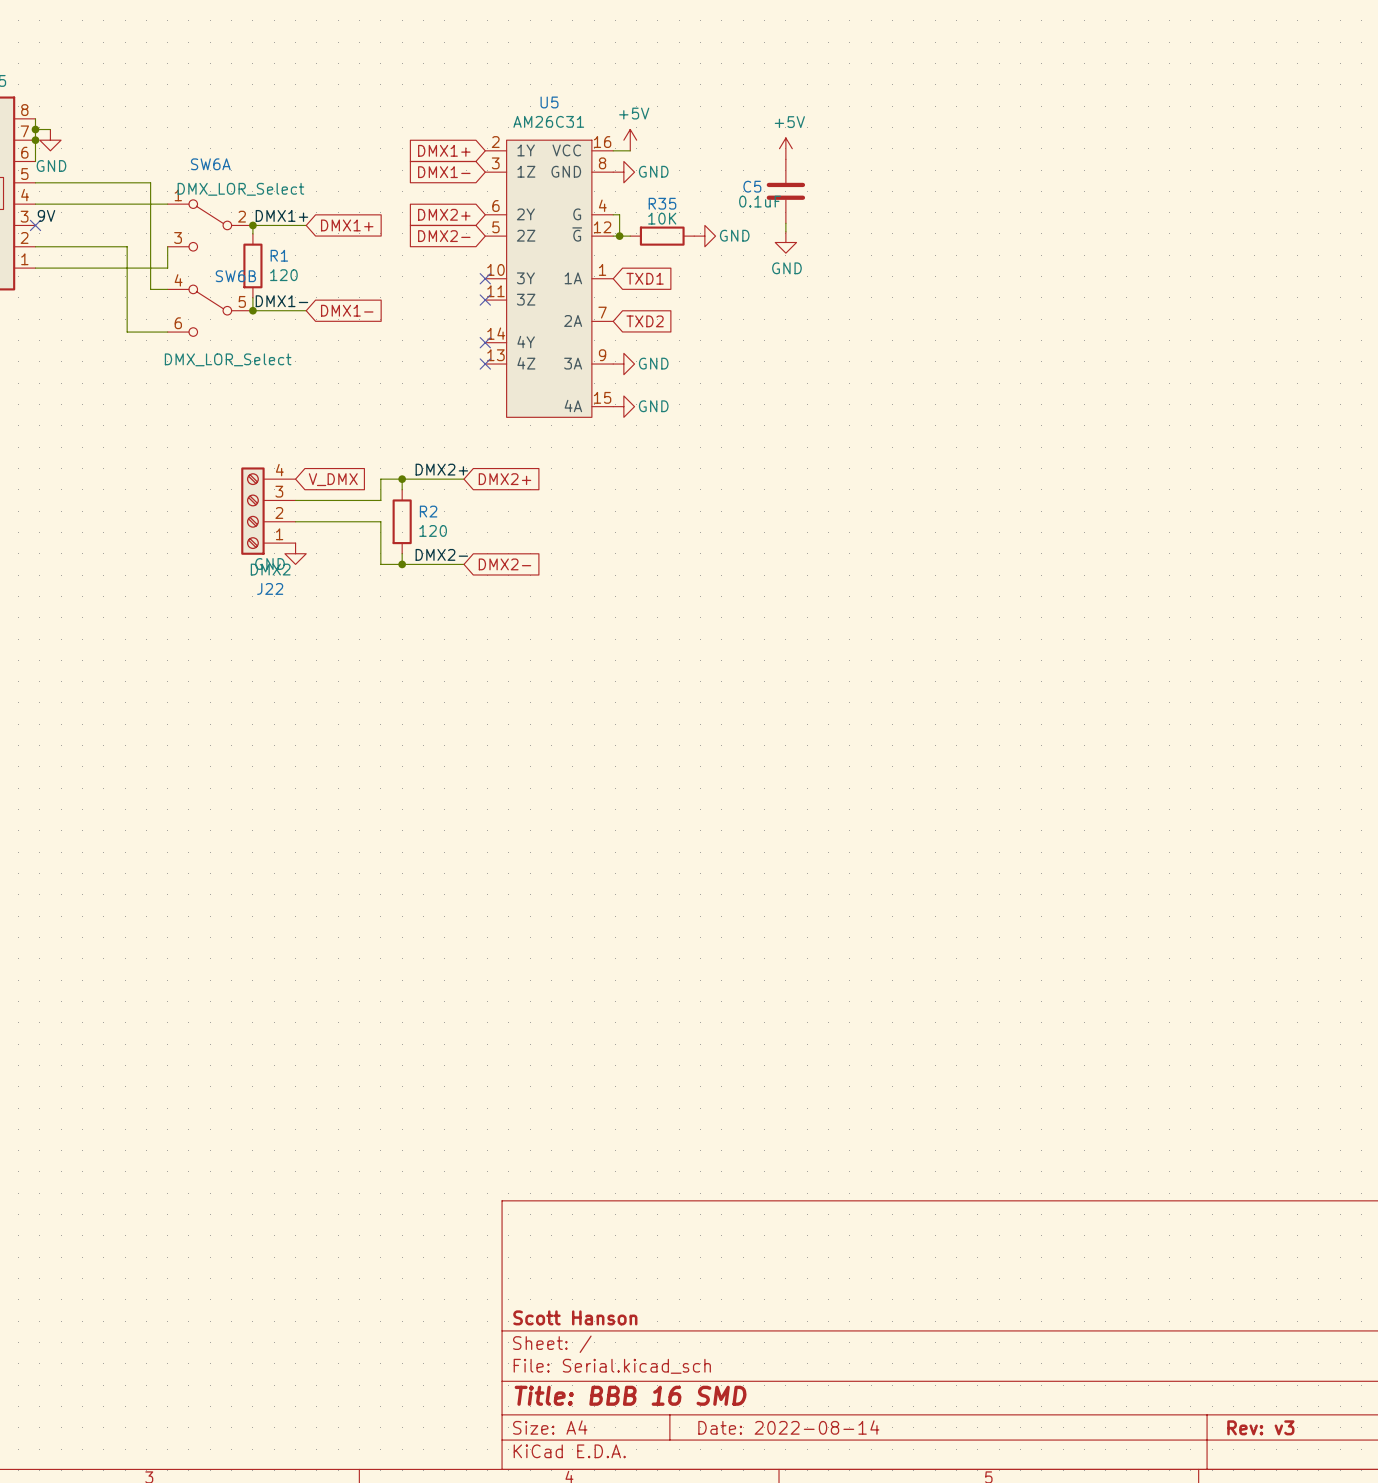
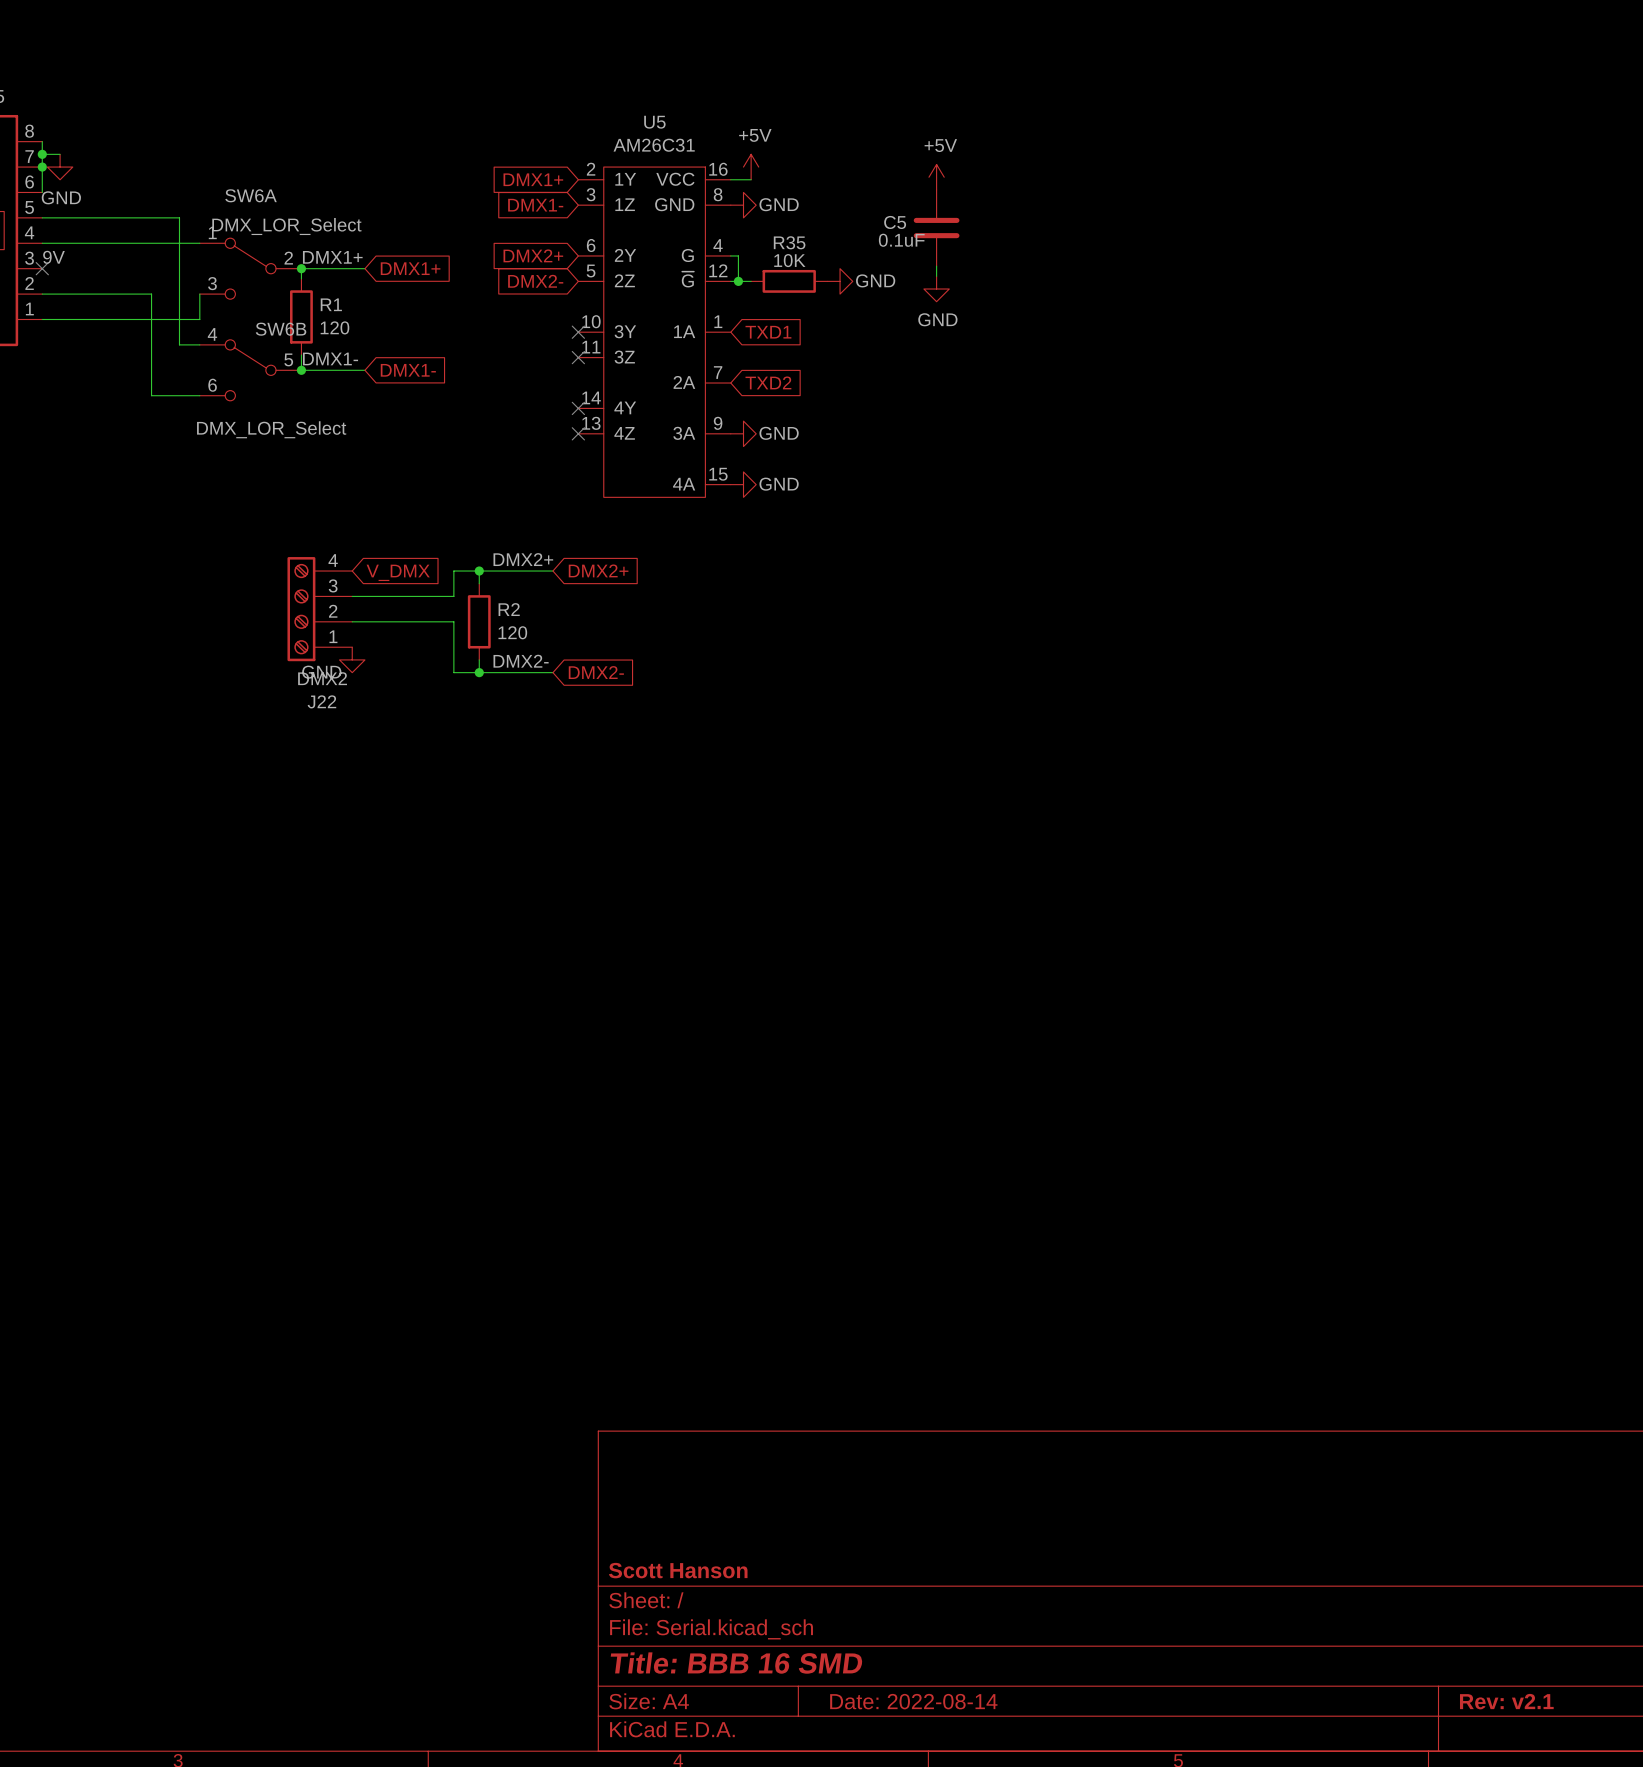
title block: Rev: v3 (1260, 1427) -> Rev: v2.1 (1506, 1701)

